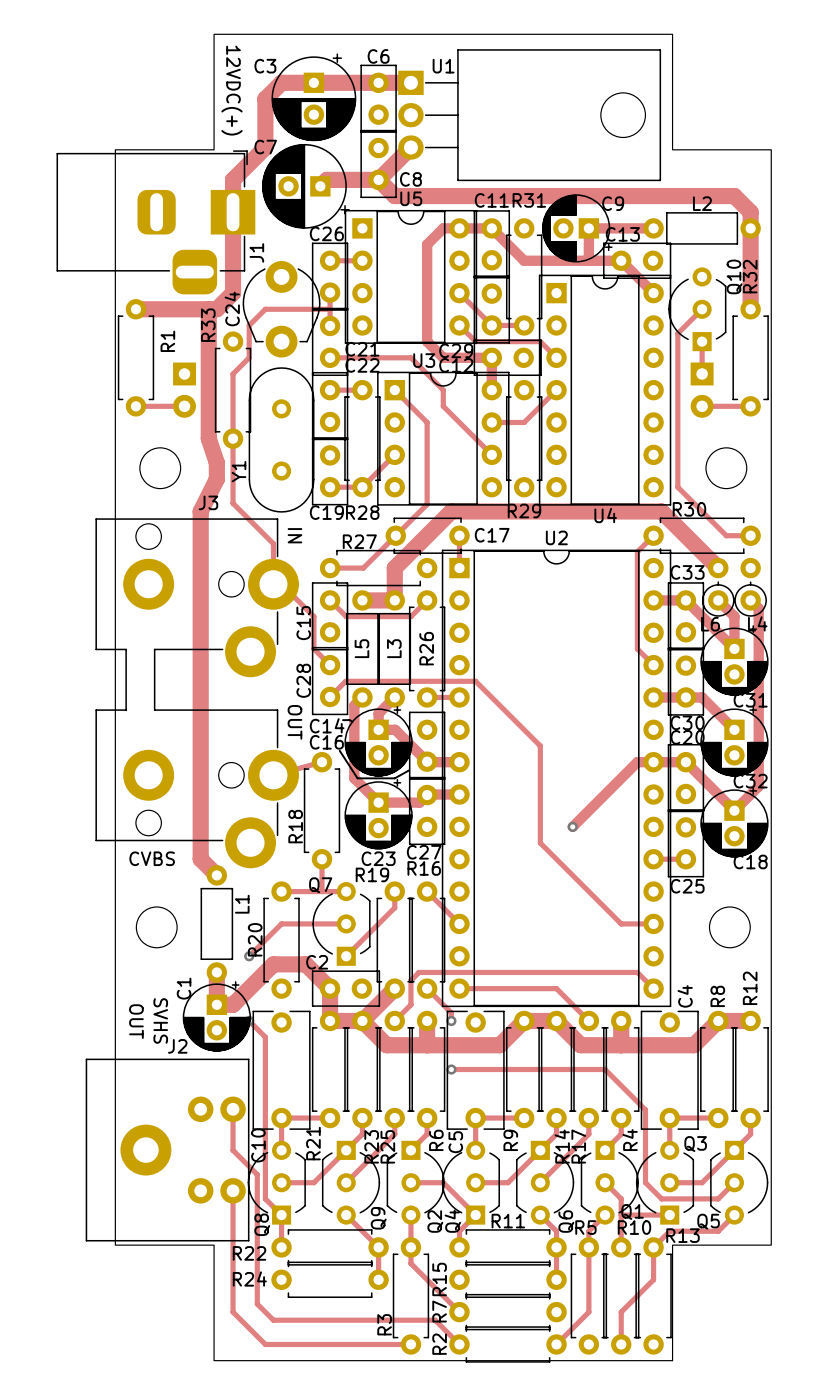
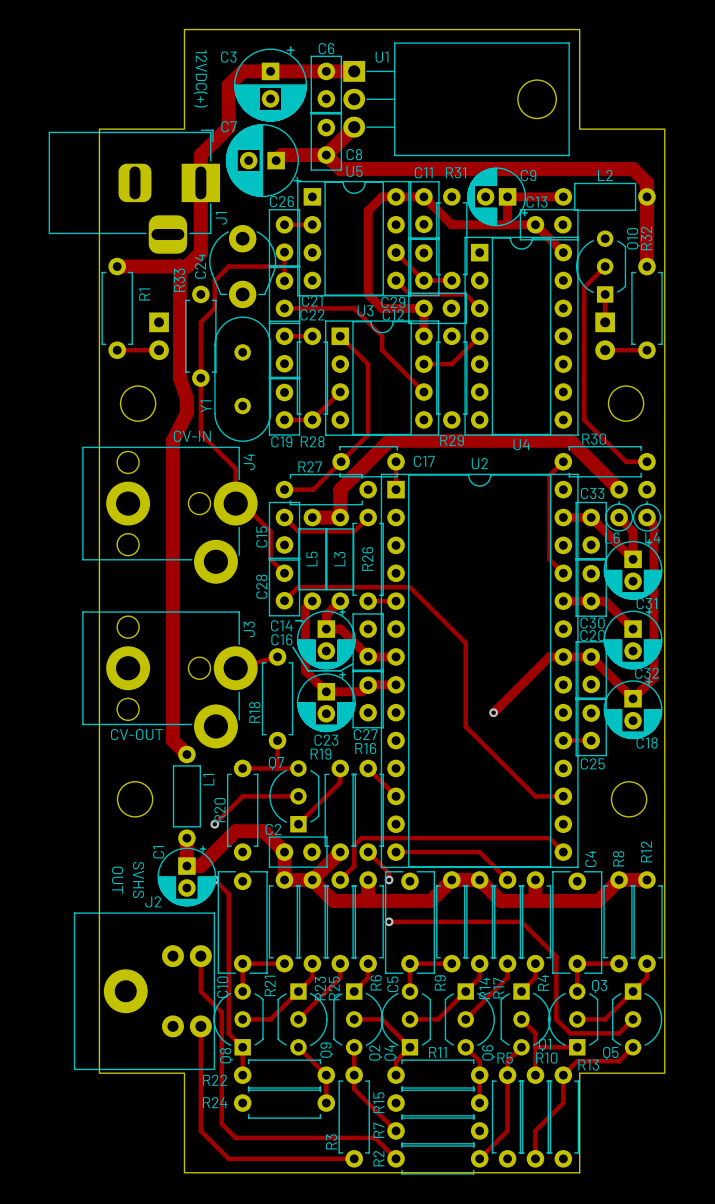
J3 name position: J3 (208, 502) -> J3 (249, 629)
J3 footprint: [95, 518, 299, 869] -> [82, 611, 258, 749]
text: IN (294, 535) -> none
J4: none -> CV-IN (169, 515)
text: OUT (294, 722) -> none
J3 value: CVBS (152, 858) -> CV-OUT (136, 734)

